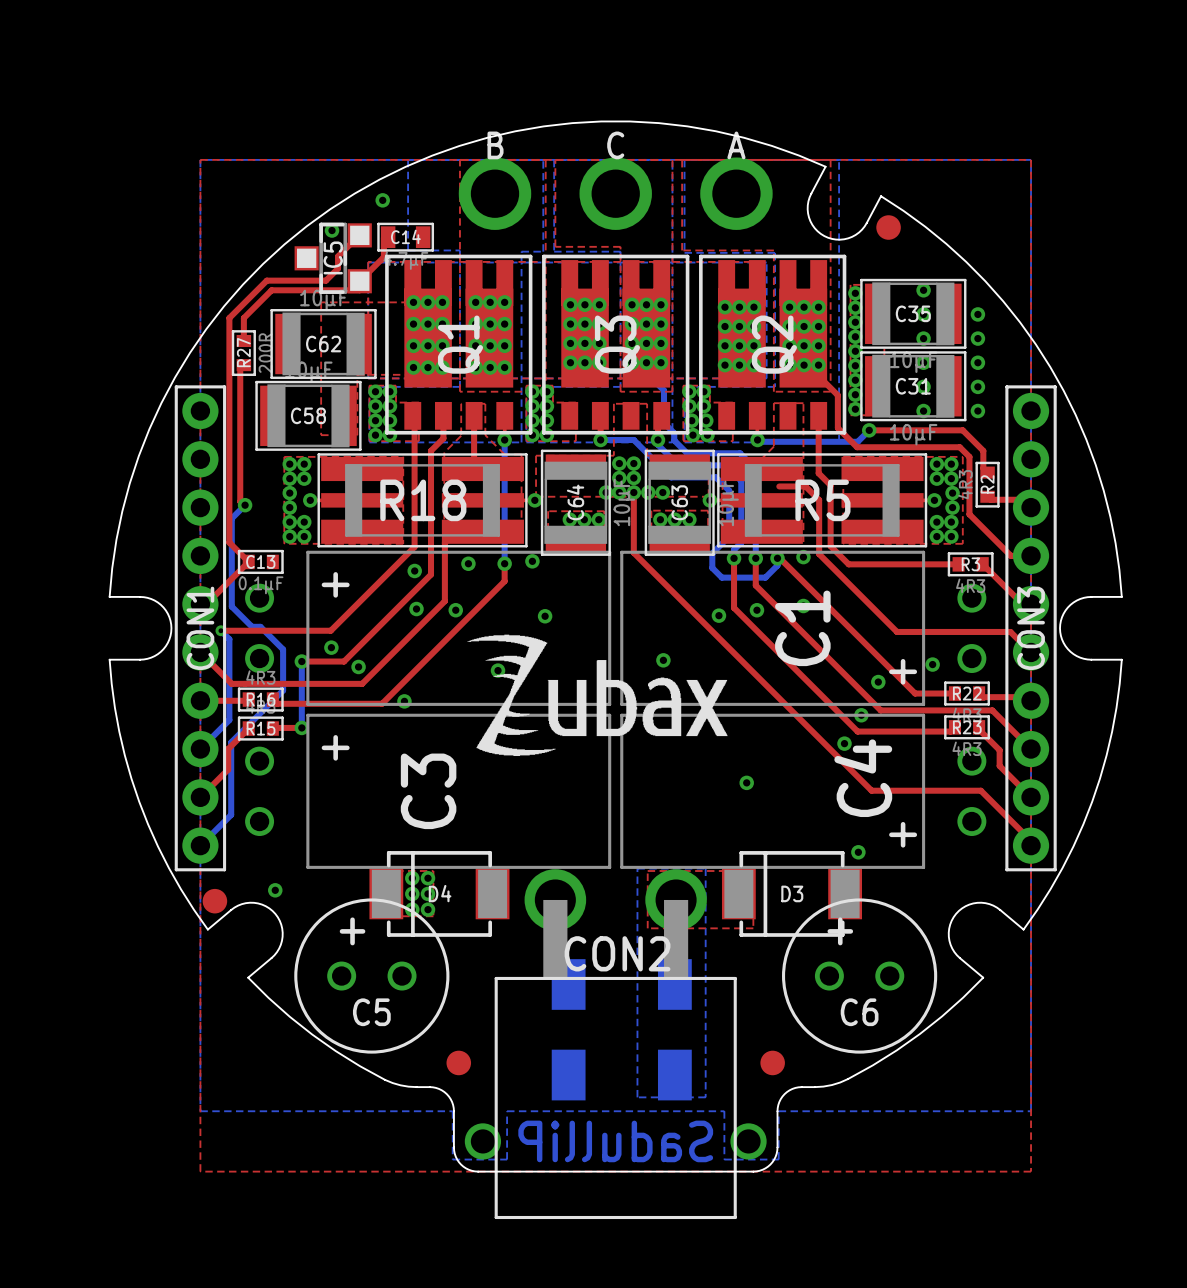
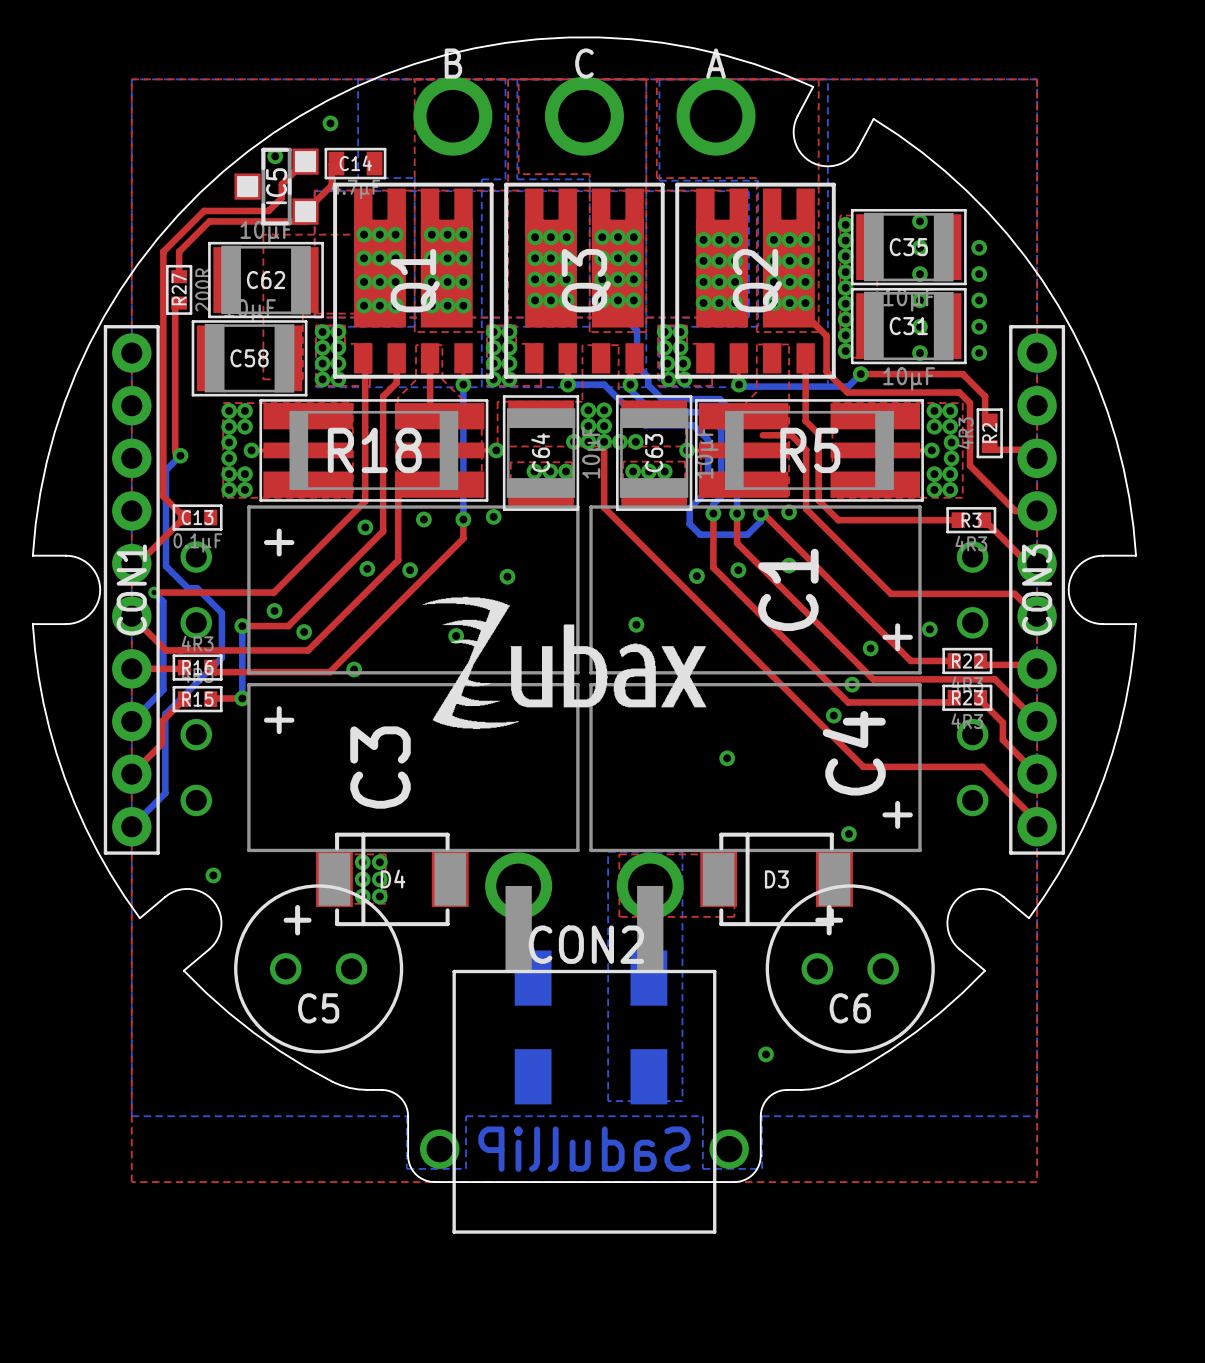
part: (888, 227) -> none
part: (214, 901) -> none
via: none -> (766, 1054)
part: (458, 1062) -> none
part: (772, 1062) -> none

